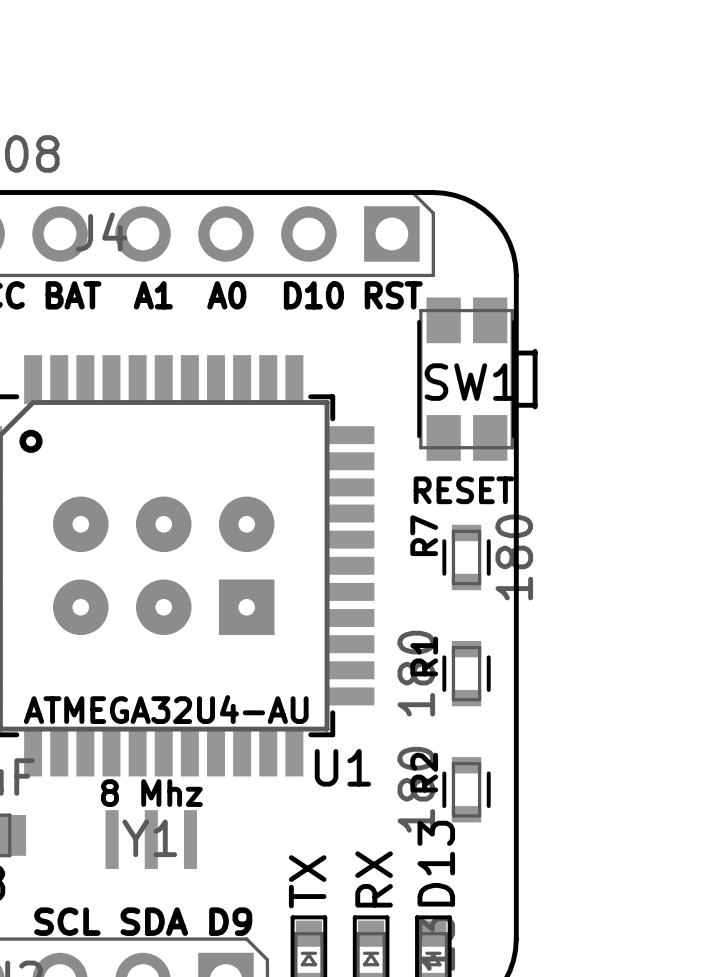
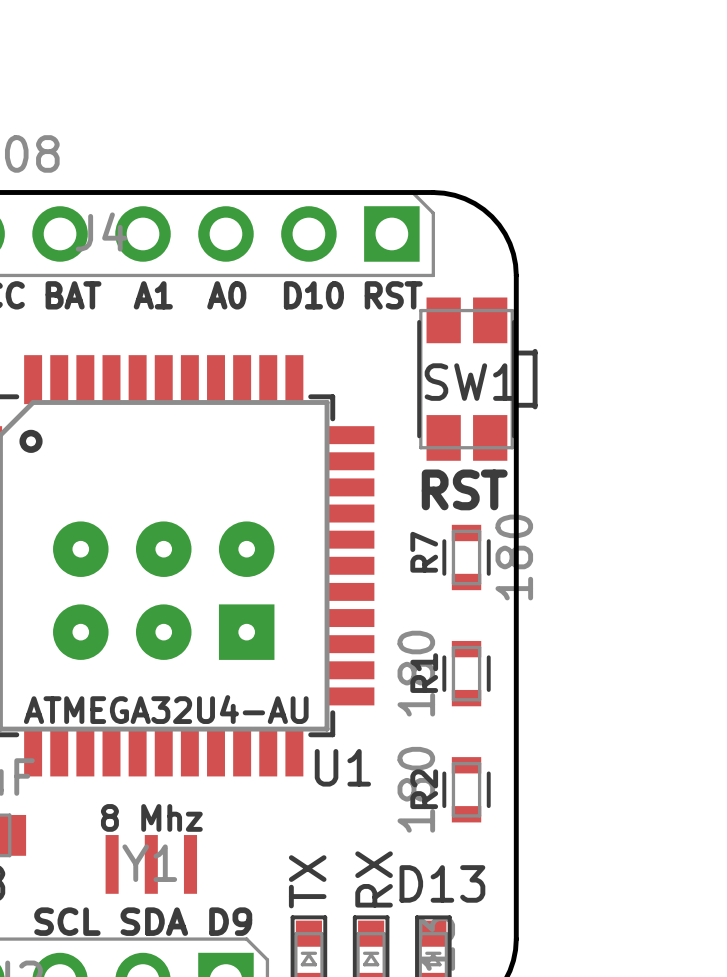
SW1 value: RESET (464, 490) -> RST (464, 489)
R7 name position: R7 (424, 535) -> R7 (424, 552)
part position: (163, 565) -> (163, 590)
R1 name position: R1 (424, 656) -> R1 (424, 673)
R2 name position: R2 (424, 772) -> R2 (424, 789)
Y1 position: (151, 839) -> (151, 864)
D13 name rotation: 0° (436, 863) -> 90° clockwise (442, 883)

